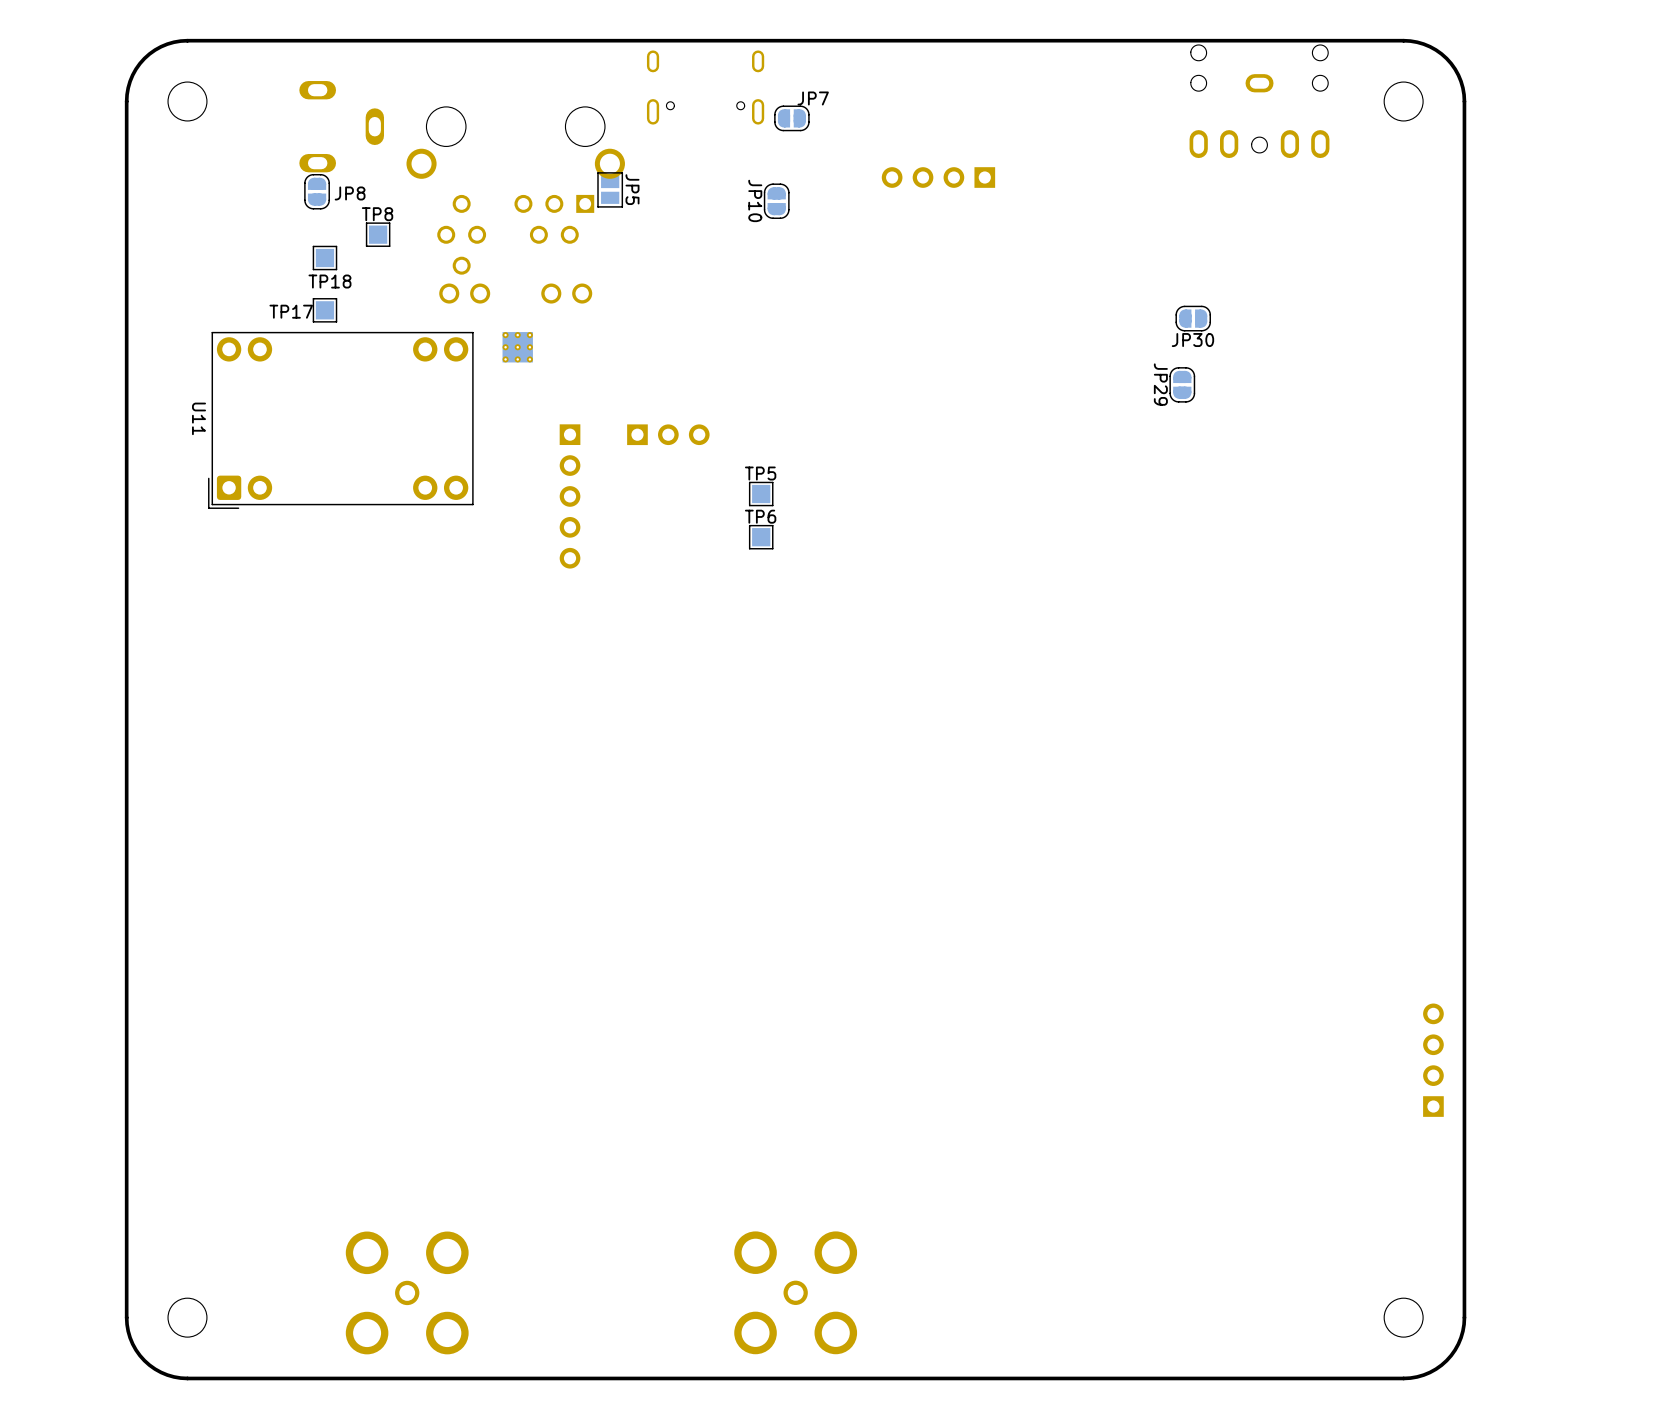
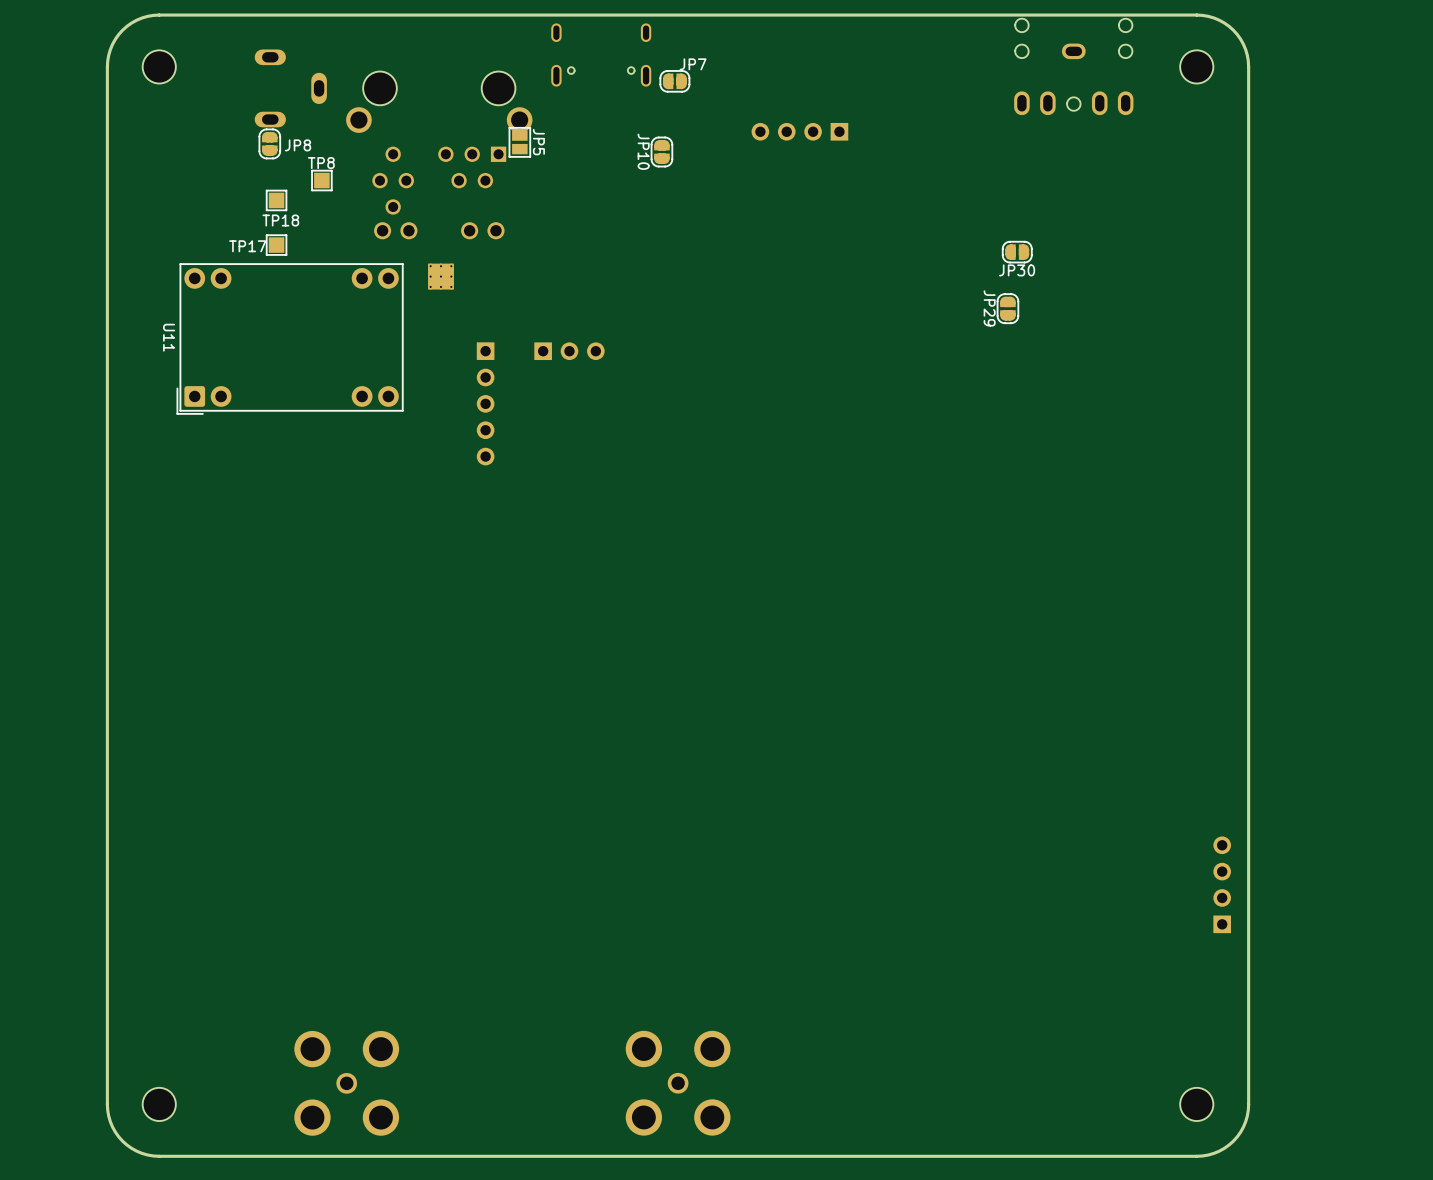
TP5: (761, 494) -> none
TP6: (761, 537) -> none

